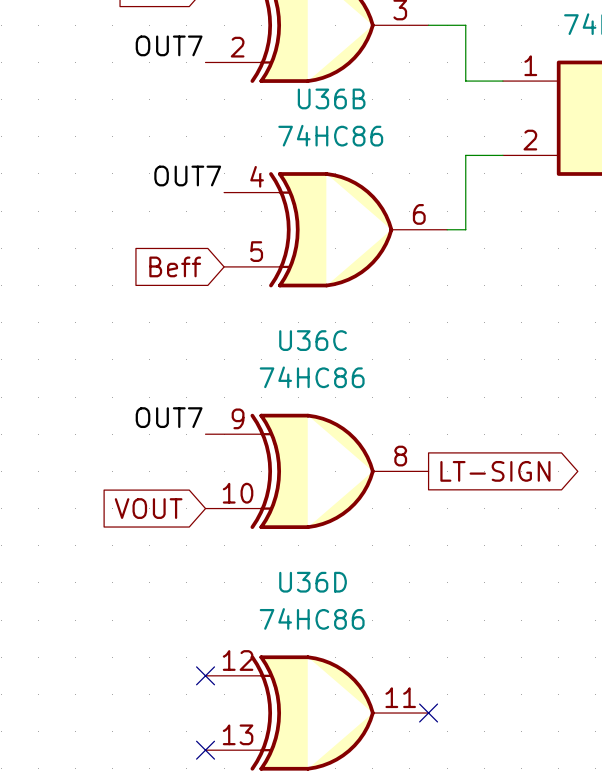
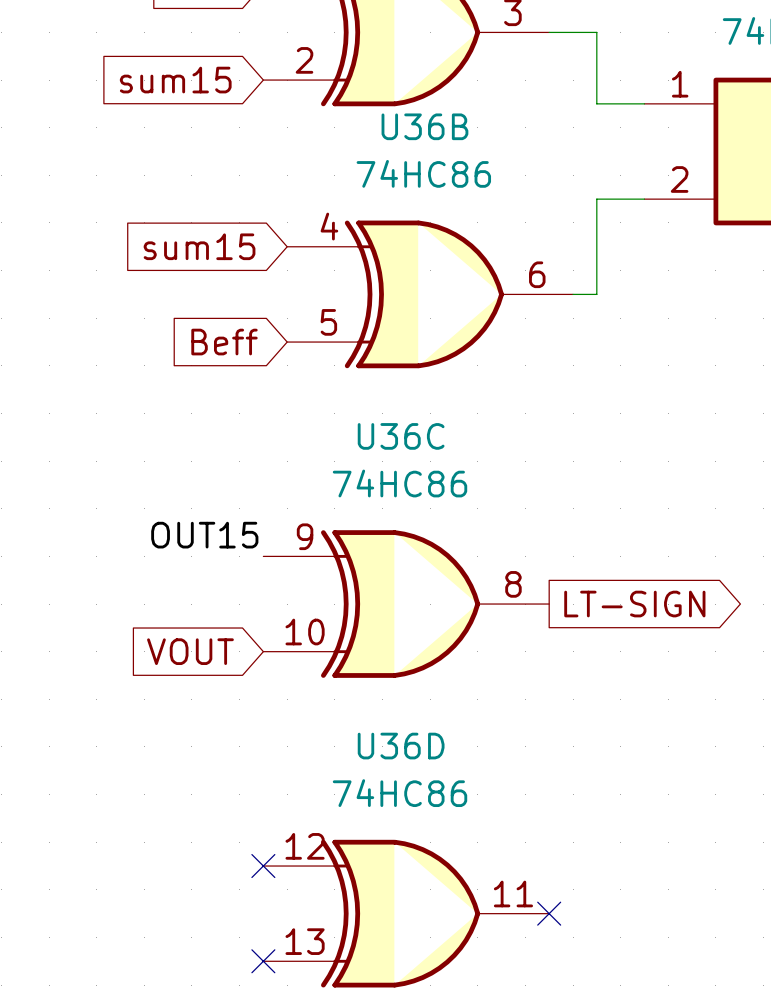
label: OUT7 (169, 45) -> none
global label: none -> sum15 (175, 80)
label: OUT7 (187, 175) -> none
global label: none -> sum15 (199, 246)
label: OUT7 (169, 417) -> OUT15 (204, 535)

